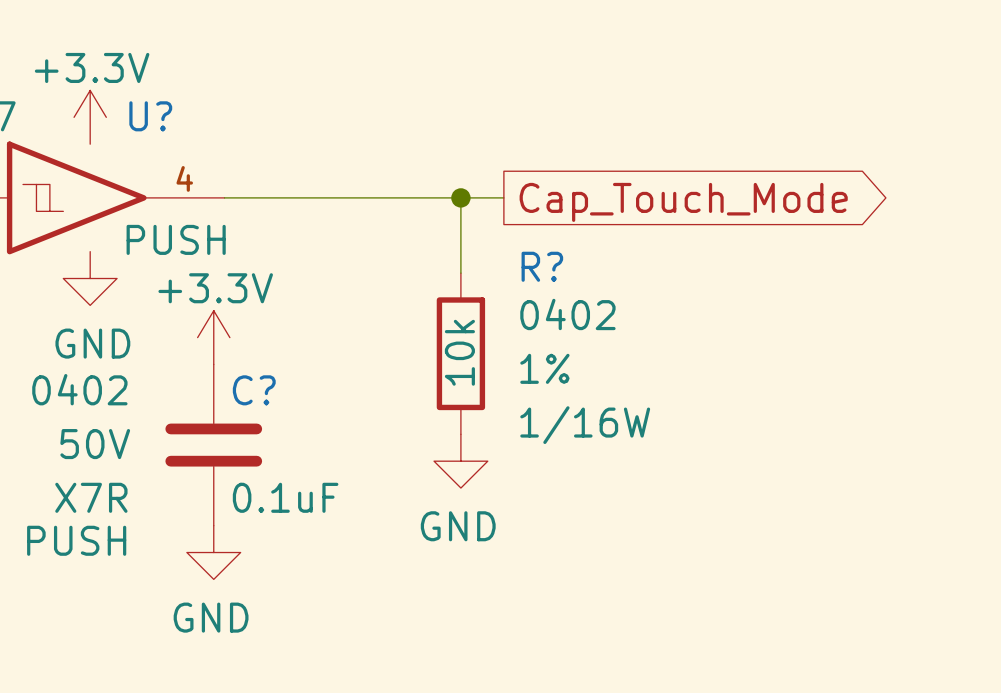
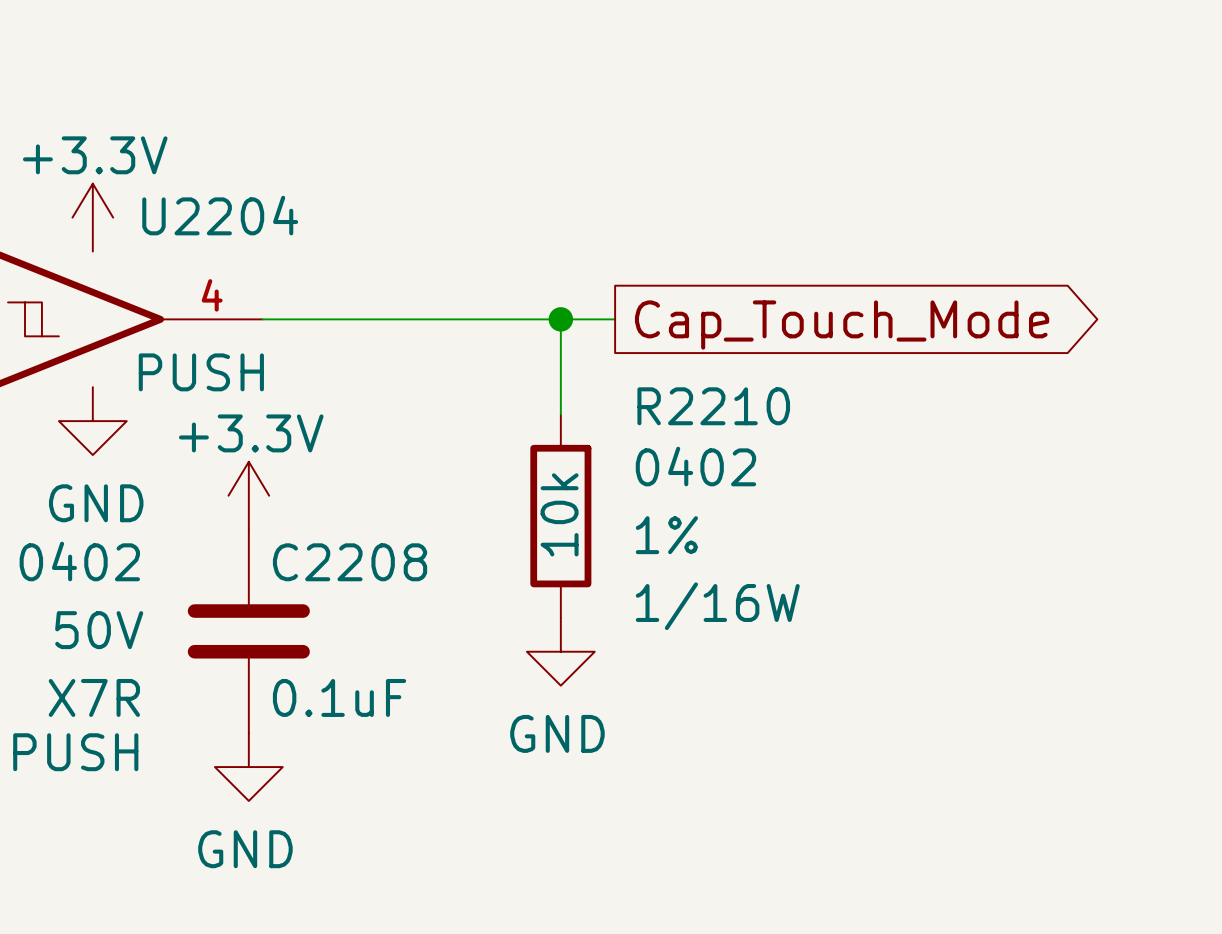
U? name: U? (150, 116) -> U2204 (220, 215)
R? name: R? (542, 266) -> R2210 (713, 406)
C? name: C? (254, 390) -> C2208 (350, 562)

